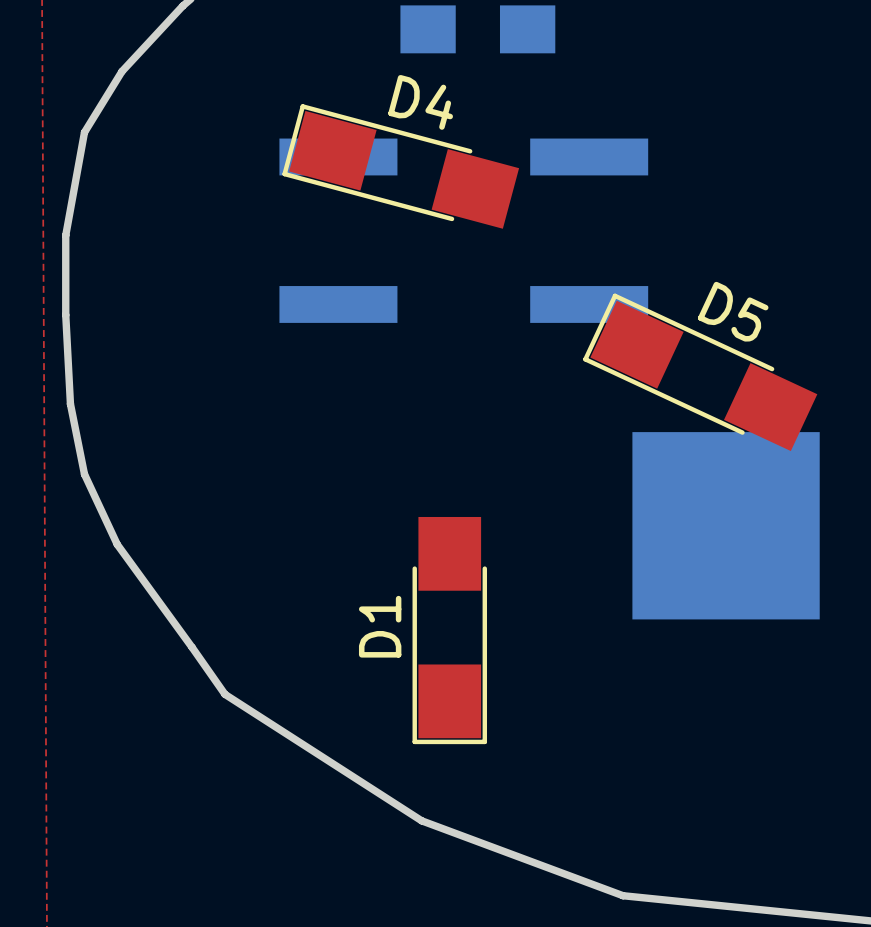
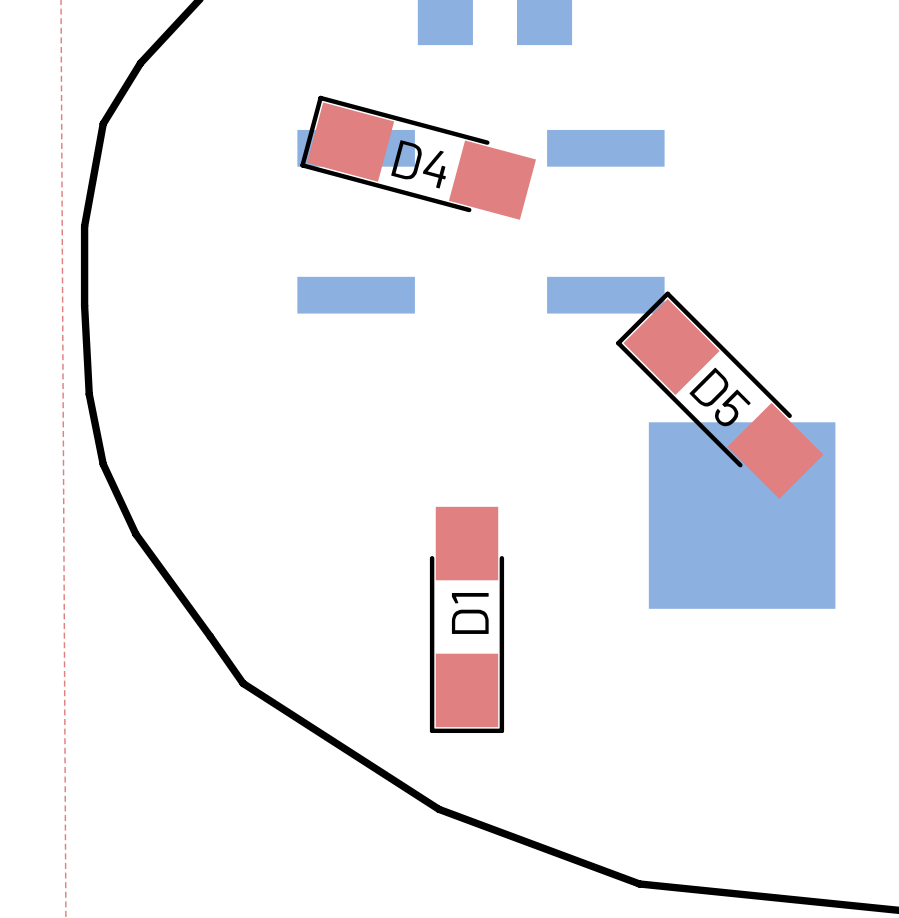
D4 name position: D4 (420, 102) -> D4 (418, 164)
D5 rotation: 0° (700, 372) -> 20° clockwise (719, 395)
D1 name position: D1 (380, 626) -> D1 (470, 613)

